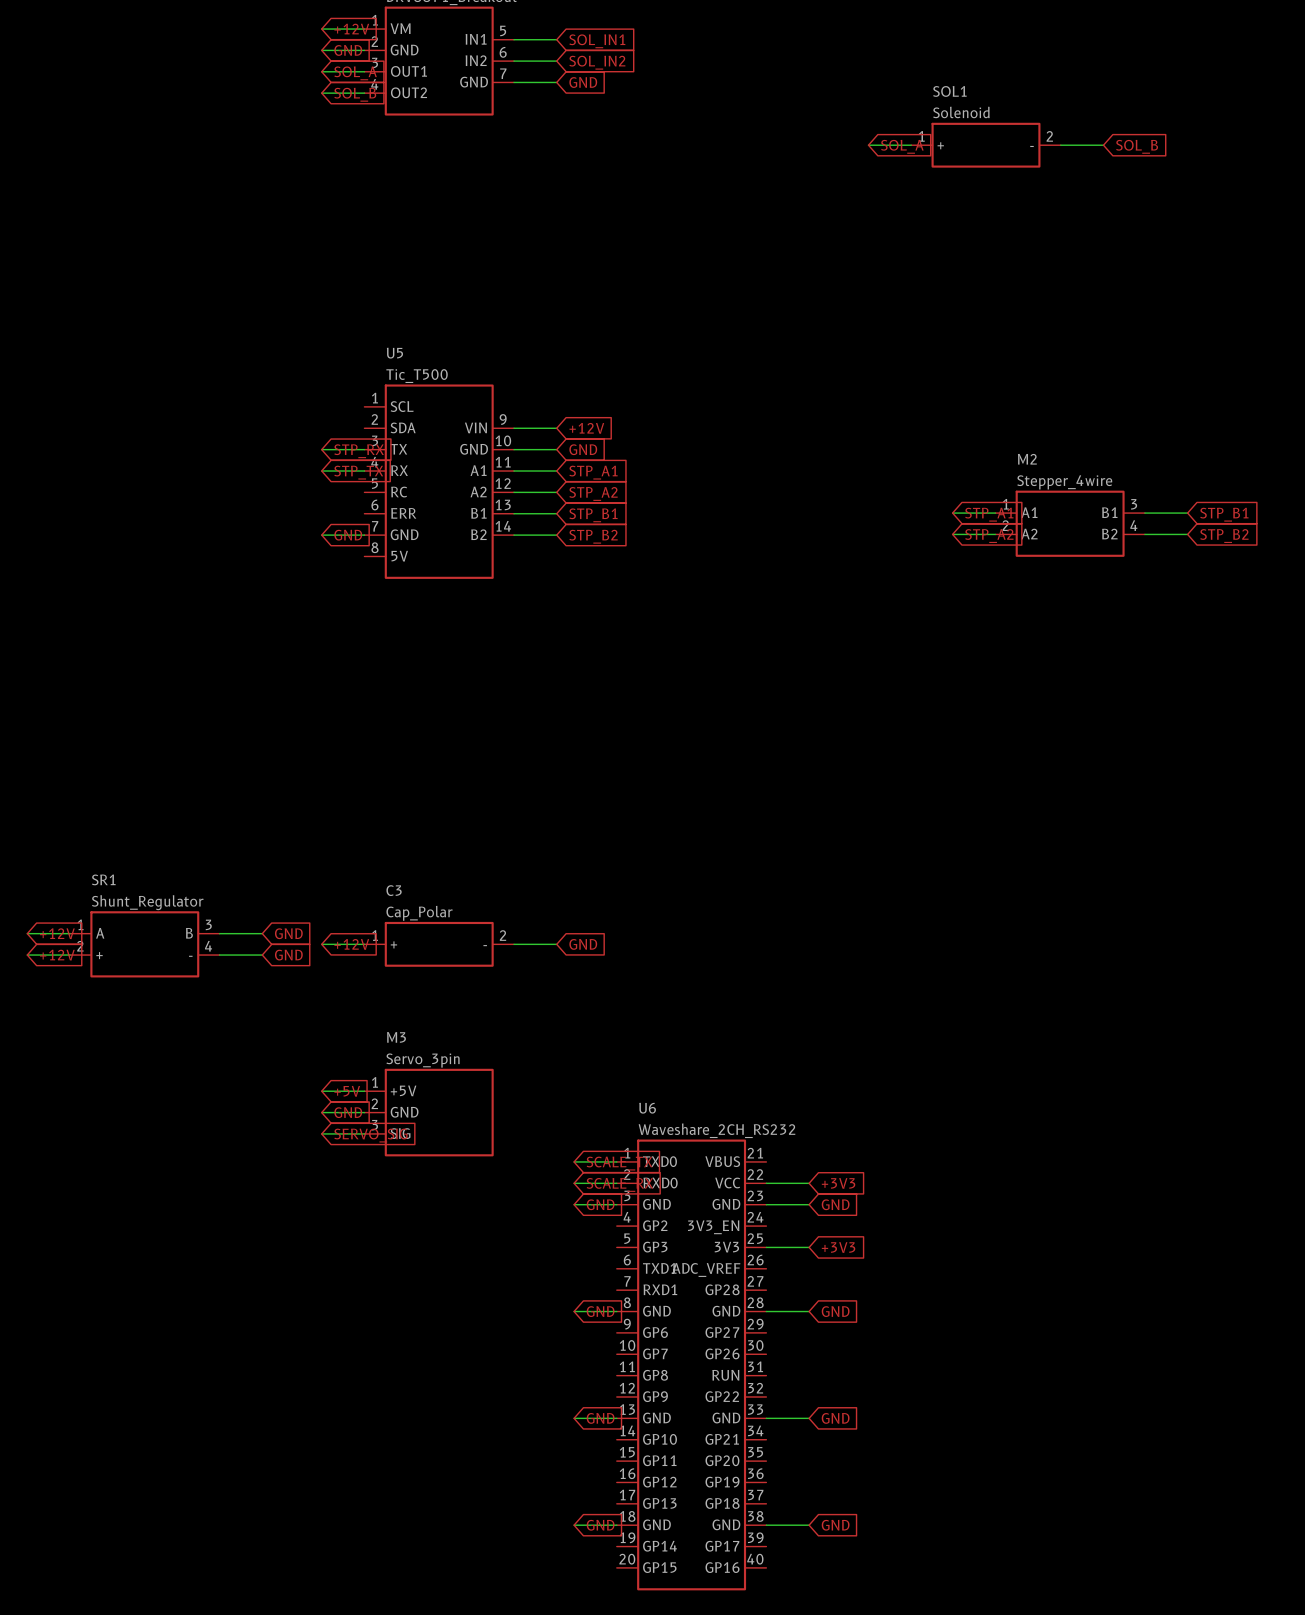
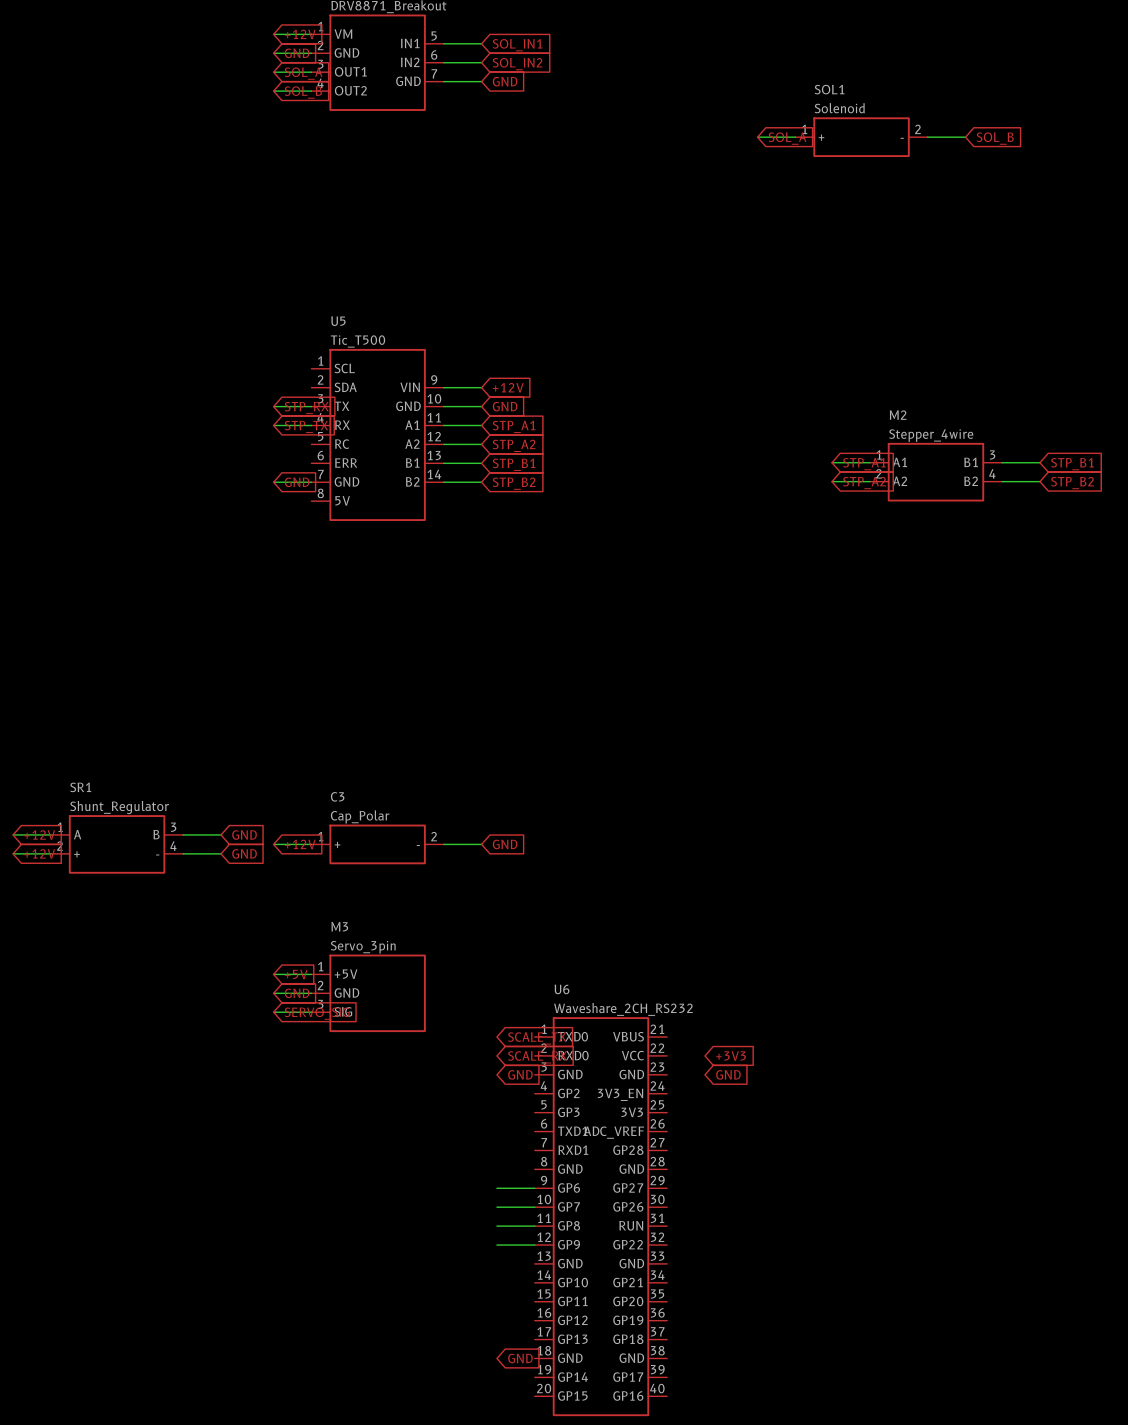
wire: (574, 1161) (616, 1161) -> (496, 1188) (534, 1188)
wire: (574, 1183) (616, 1183) -> (496, 1207) (534, 1207)
wire: (766, 1183) (809, 1183) -> none
wire: (574, 1204) (616, 1204) -> (496, 1226) (534, 1226)
wire: (766, 1204) (809, 1204) -> none
wire: (766, 1247) (809, 1247) -> none
global label: +3V3 (838, 1247) -> none
wire: (574, 1311) (616, 1311) -> none
global label: GND (600, 1311) -> none
wire: (766, 1311) (809, 1311) -> none
global label: GND (835, 1311) -> none
wire: (574, 1418) (616, 1418) -> (496, 1245) (534, 1245)
global label: GND (600, 1418) -> none
wire: (766, 1418) (809, 1418) -> none
global label: GND (835, 1418) -> none
wire: (574, 1525) (616, 1525) -> none
wire: (766, 1525) (809, 1525) -> none
global label: GND (835, 1525) -> none

